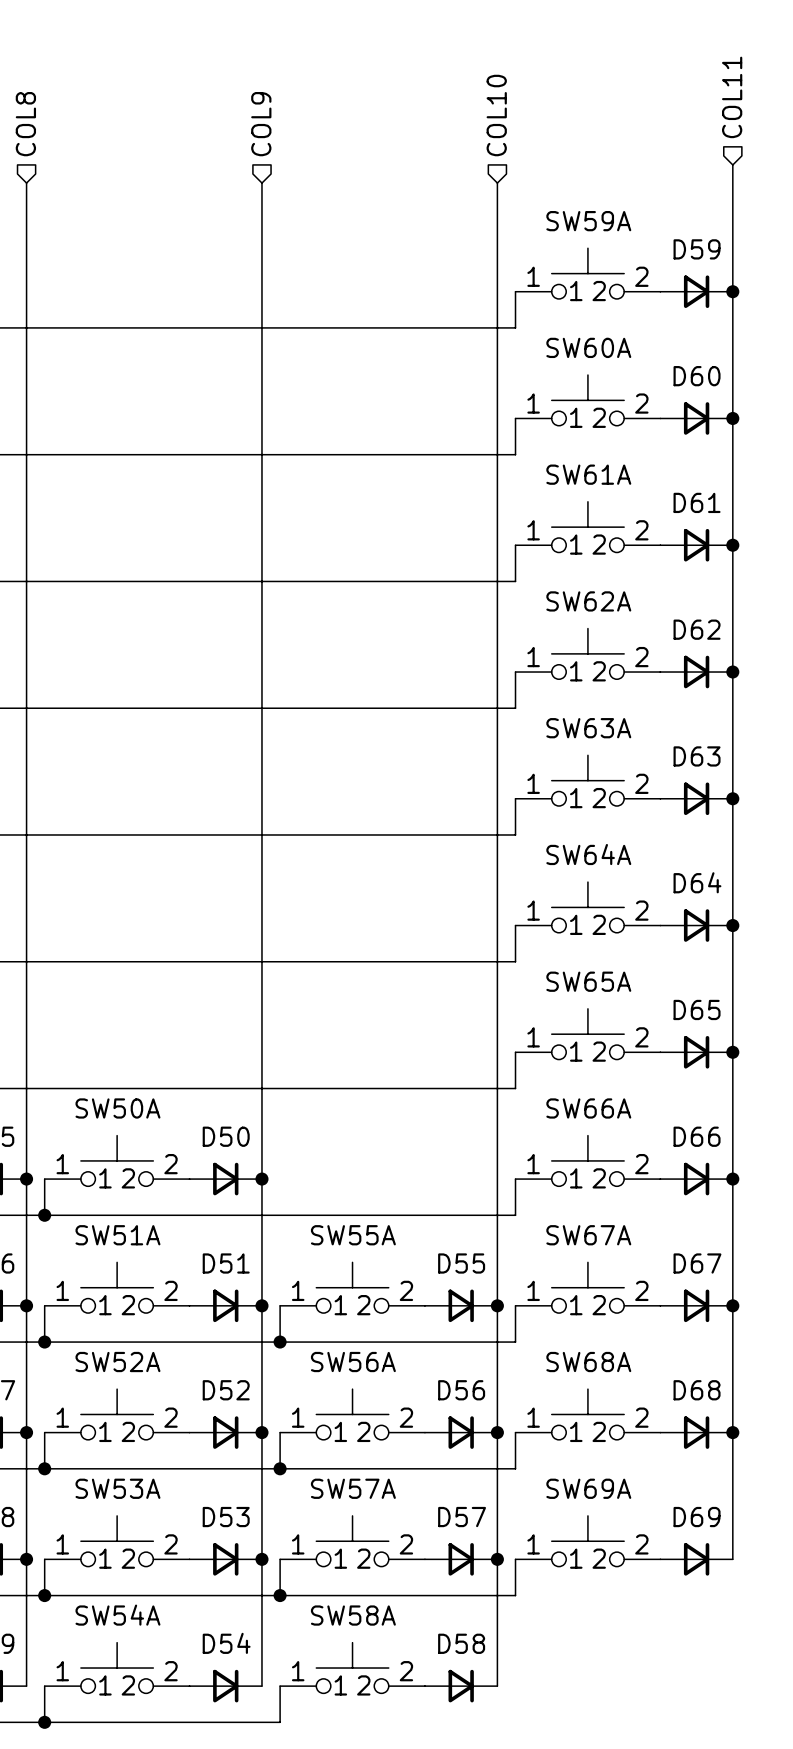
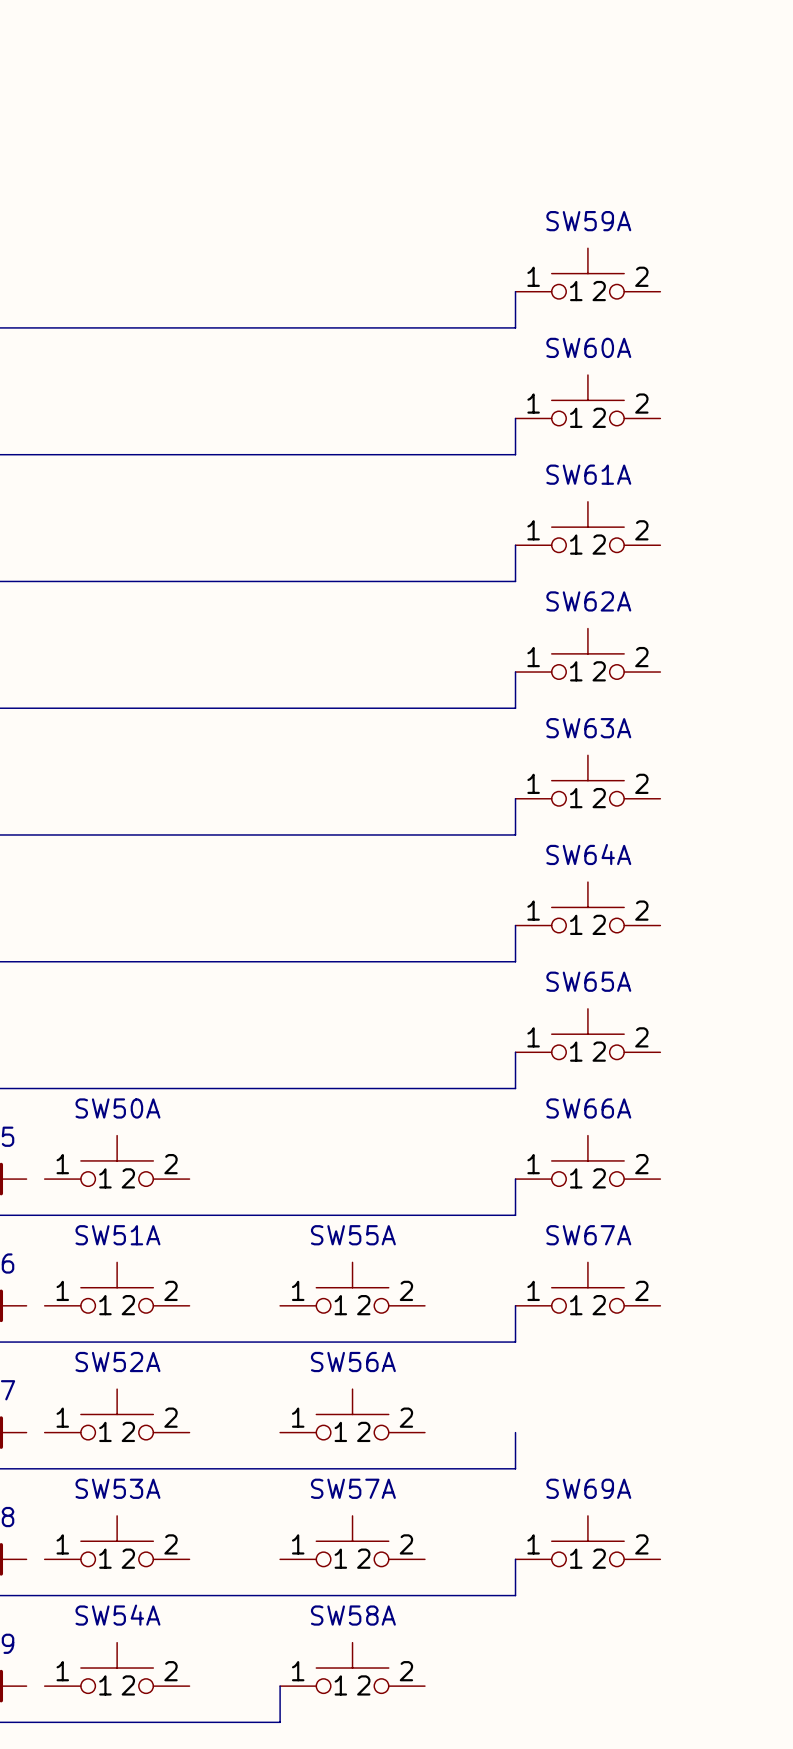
hierarchical label: COL11 (732, 97) -> none
hierarchical label: COL10 (496, 115) -> none
hierarchical label: COL8 (25, 124) -> none
hierarchical label: COL9 (261, 124) -> none
wire: (732, 164) (732, 1559) -> none
wire: (26, 183) (26, 1686) -> none
wire: (261, 183) (261, 1686) -> none
wire: (497, 183) (497, 1686) -> none
D59: (696, 291) -> none
junction: (732, 291) -> none
D60: (696, 418) -> none
junction: (732, 418) -> none
D61: (696, 545) -> none
junction: (732, 545) -> none
D62: (696, 672) -> none
junction: (732, 672) -> none
D63: (696, 798) -> none
junction: (732, 798) -> none
D64: (696, 925) -> none
junction: (732, 925) -> none
D65: (696, 1052) -> none
junction: (732, 1052) -> none
junction: (26, 1179) -> none
wire: (44, 1179) (44, 1215) -> none
D50: (225, 1179) -> none
junction: (261, 1179) -> none
D66: (696, 1179) -> none
junction: (732, 1179) -> none
junction: (44, 1215) -> none
junction: (26, 1305) -> none
wire: (44, 1305) (44, 1342) -> none
D51: (225, 1305) -> none
junction: (261, 1305) -> none
wire: (280, 1305) (280, 1342) -> none
D55: (461, 1305) -> none
junction: (497, 1305) -> none
D67: (696, 1305) -> none
junction: (732, 1305) -> none
junction: (44, 1342) -> none
junction: (280, 1342) -> none
SW68A: (587, 1414) -> none
junction: (26, 1432) -> none
wire: (44, 1432) (44, 1468) -> none
D52: (225, 1432) -> none
junction: (261, 1432) -> none
wire: (280, 1432) (280, 1468) -> none
D56: (461, 1432) -> none
junction: (497, 1432) -> none
D68: (696, 1432) -> none
junction: (732, 1432) -> none
junction: (44, 1468) -> none
junction: (280, 1468) -> none
junction: (26, 1559) -> none
wire: (44, 1559) (44, 1595) -> none
D53: (225, 1559) -> none
junction: (261, 1559) -> none
wire: (280, 1559) (280, 1595) -> none
D57: (461, 1559) -> none
junction: (497, 1559) -> none
D69: (696, 1559) -> none
junction: (44, 1595) -> none
junction: (280, 1595) -> none
wire: (44, 1686) (44, 1722) -> none
D54: (225, 1686) -> none
D58: (461, 1686) -> none
junction: (44, 1722) -> none

